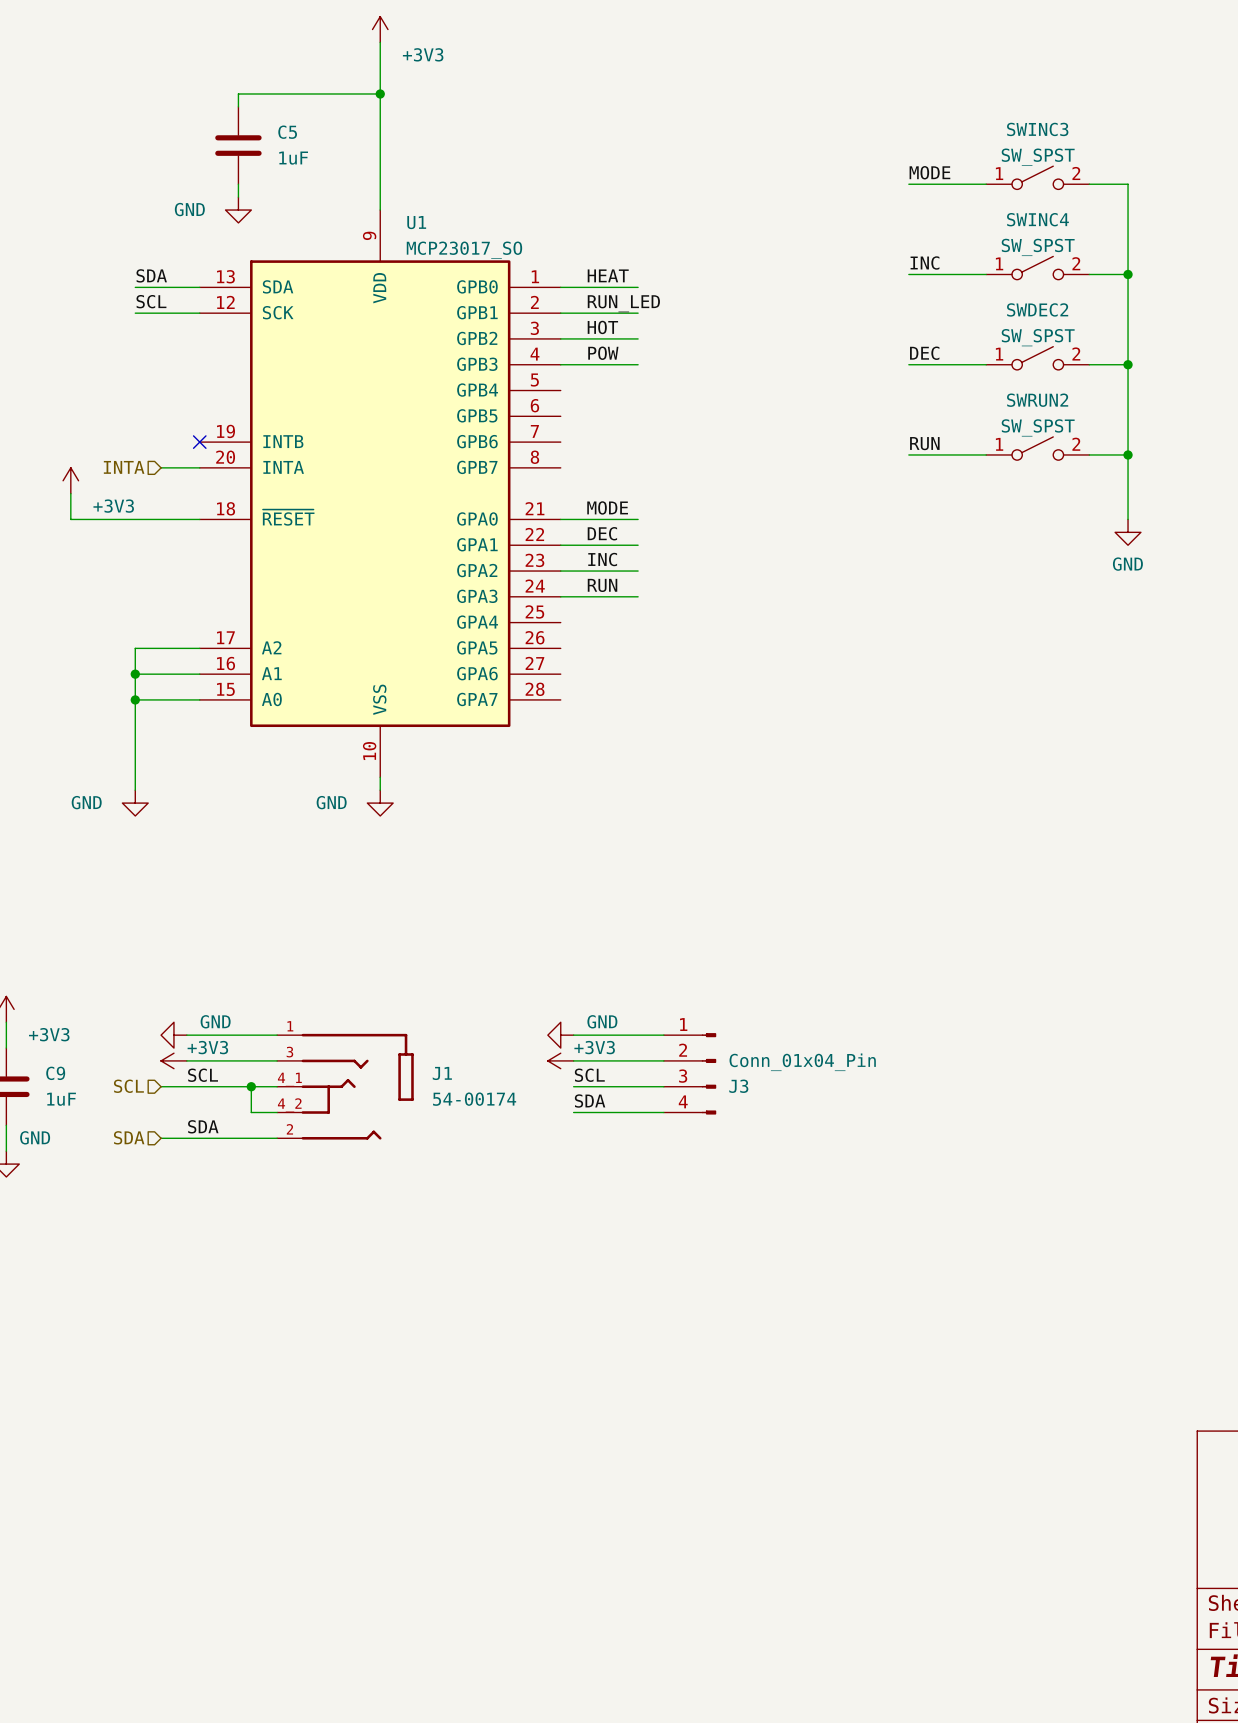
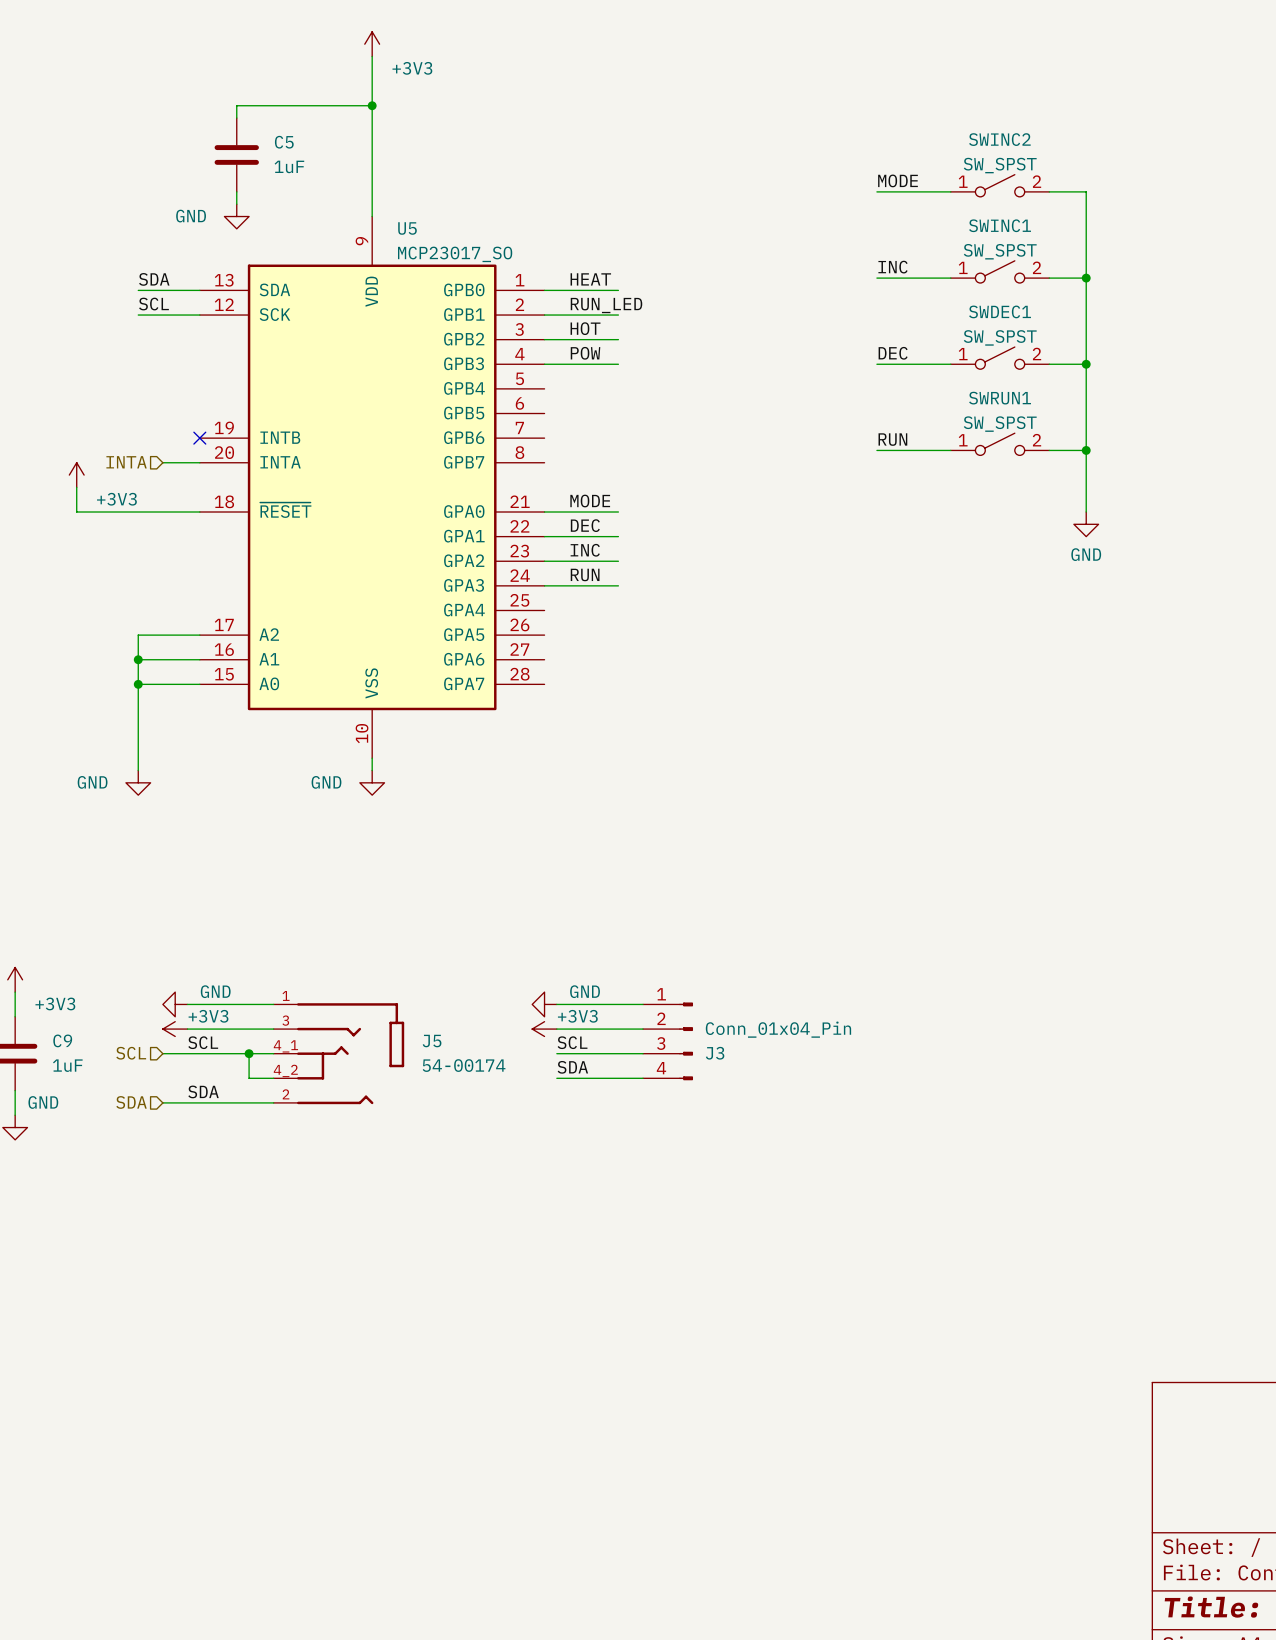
SWINC3 name: SWINC3 (1037, 129) -> SWINC2 (999, 139)
SWINC4 name: SWINC4 (1037, 219) -> SWINC1 (1000, 225)
U1 name: U1 (416, 222) -> U5 (407, 228)
SWDEC2 name: SWDEC2 (1037, 309) -> SWDEC1 (1000, 311)
SWRUN2 name: SWRUN2 (1037, 400) -> SWRUN1 (1000, 398)
J1 name: J1 (442, 1073) -> J5 (432, 1041)

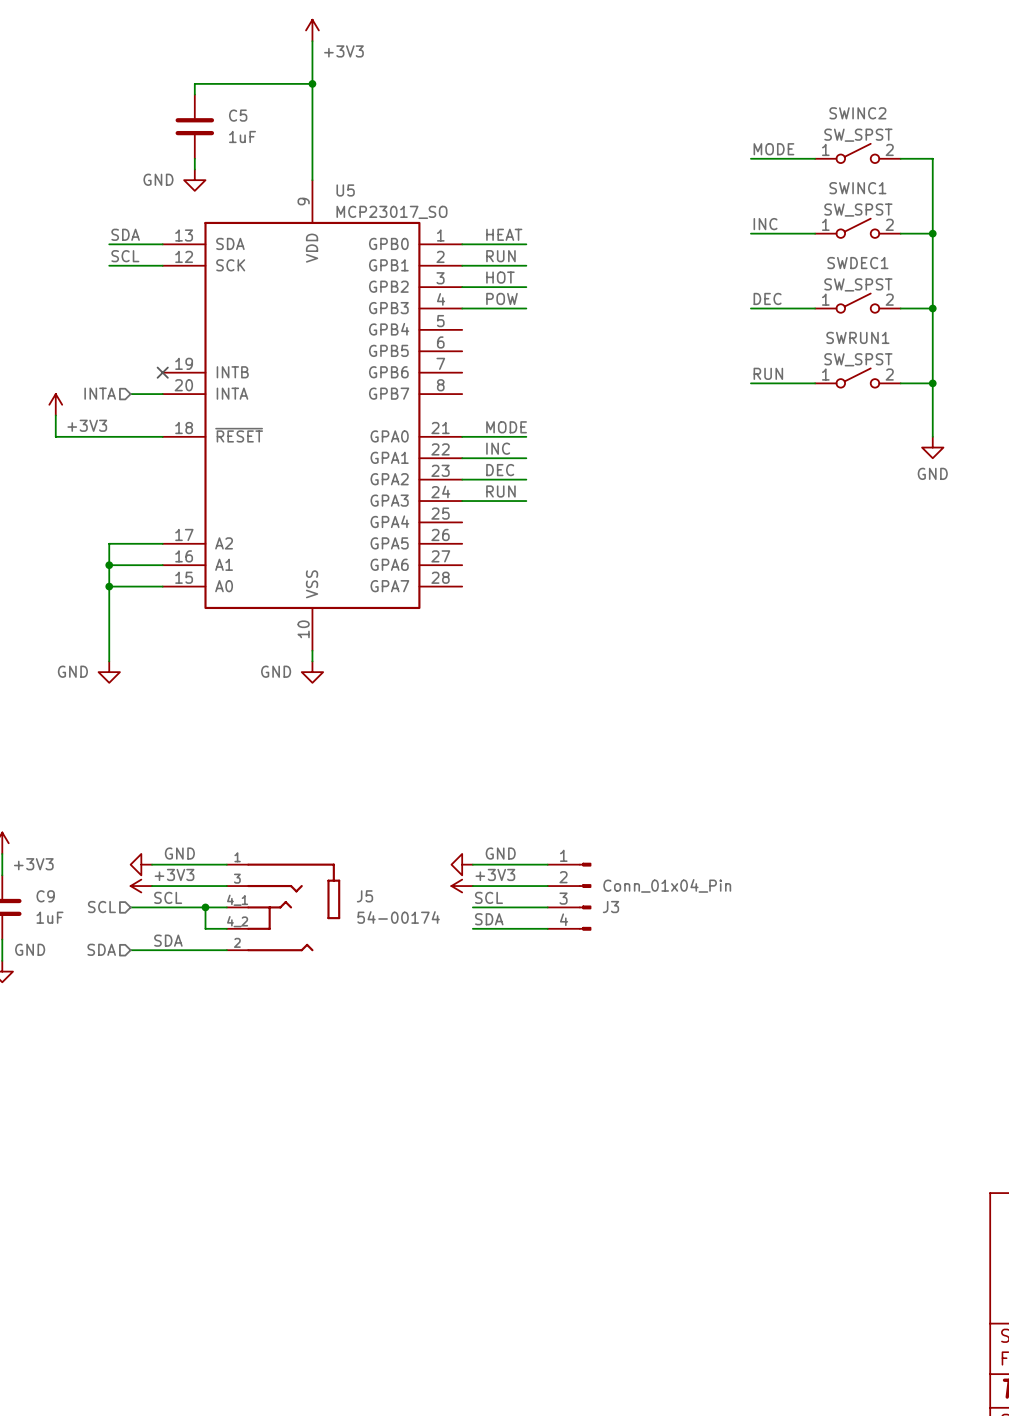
label: RUN_LED (606, 305) -> RUN (500, 256)
label: DEC (585, 525) -> INC (498, 448)
label: INC (585, 550) -> DEC (500, 470)

